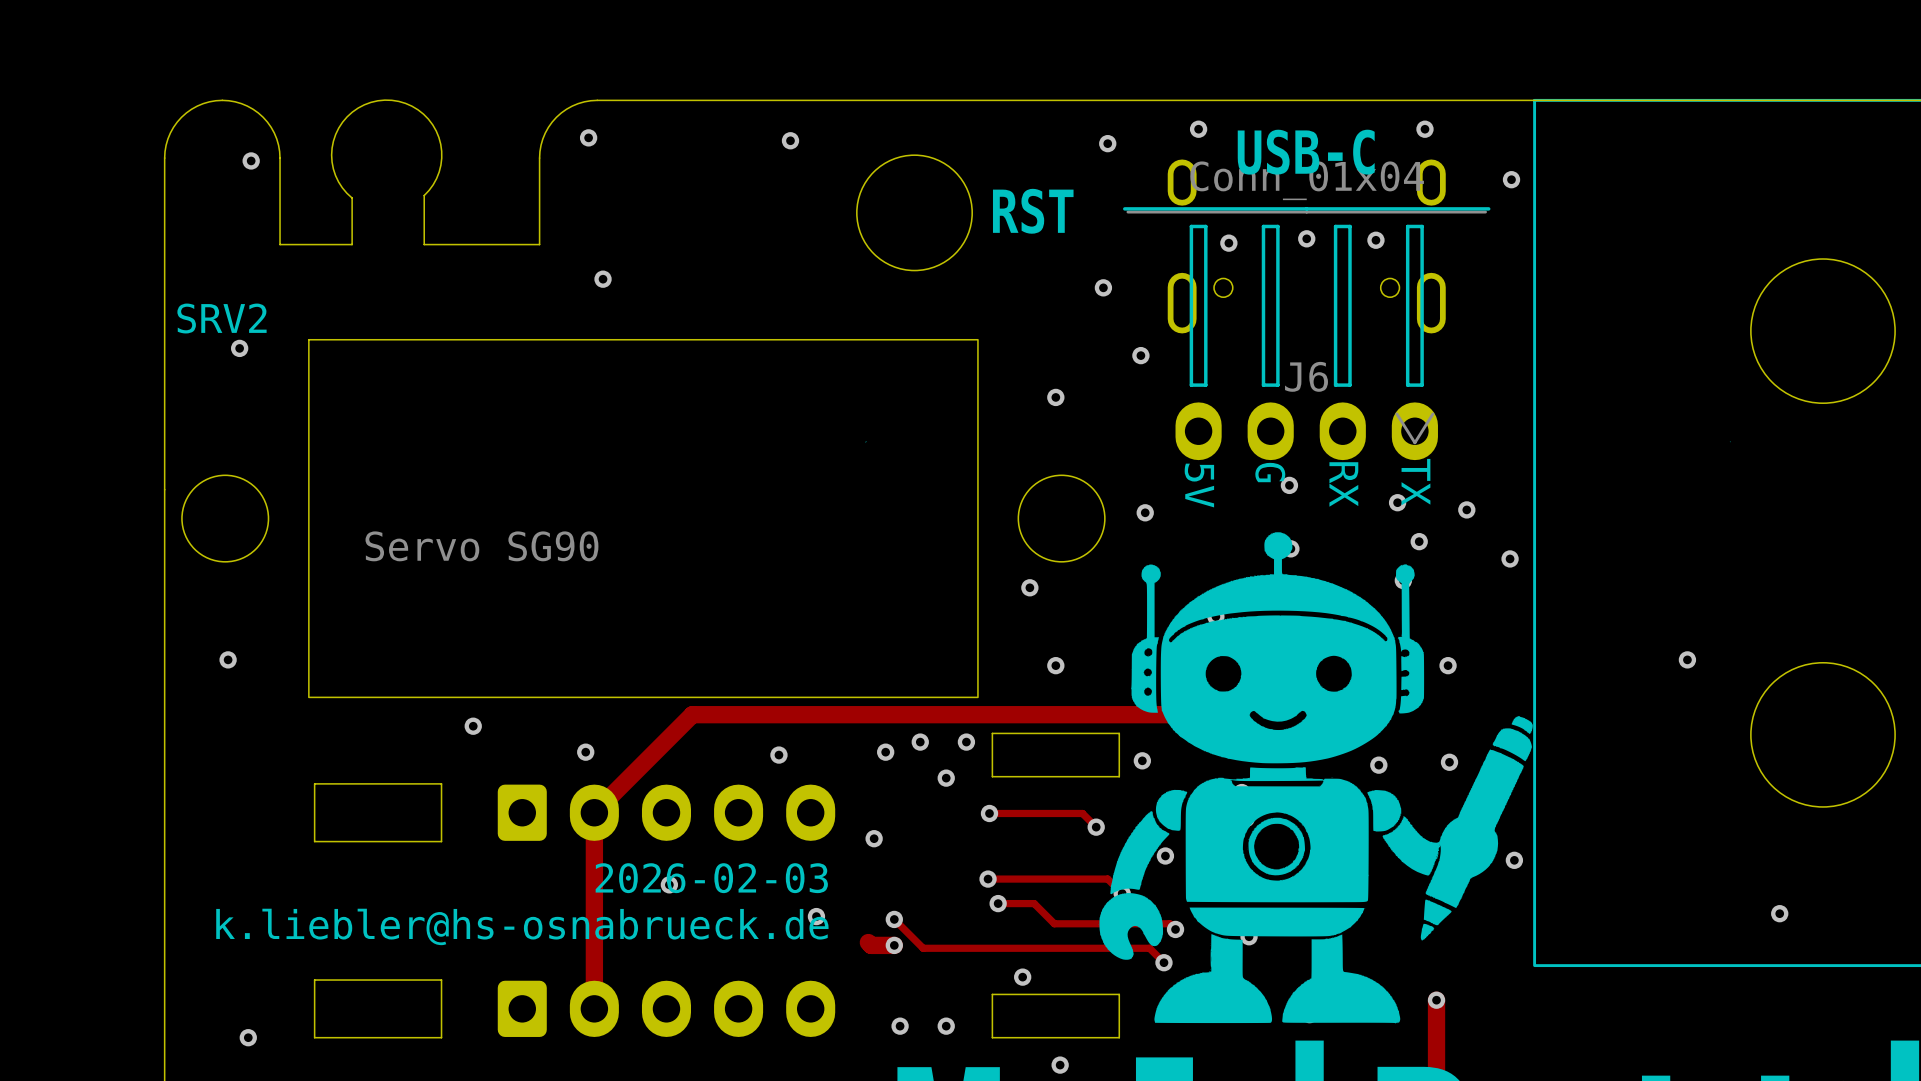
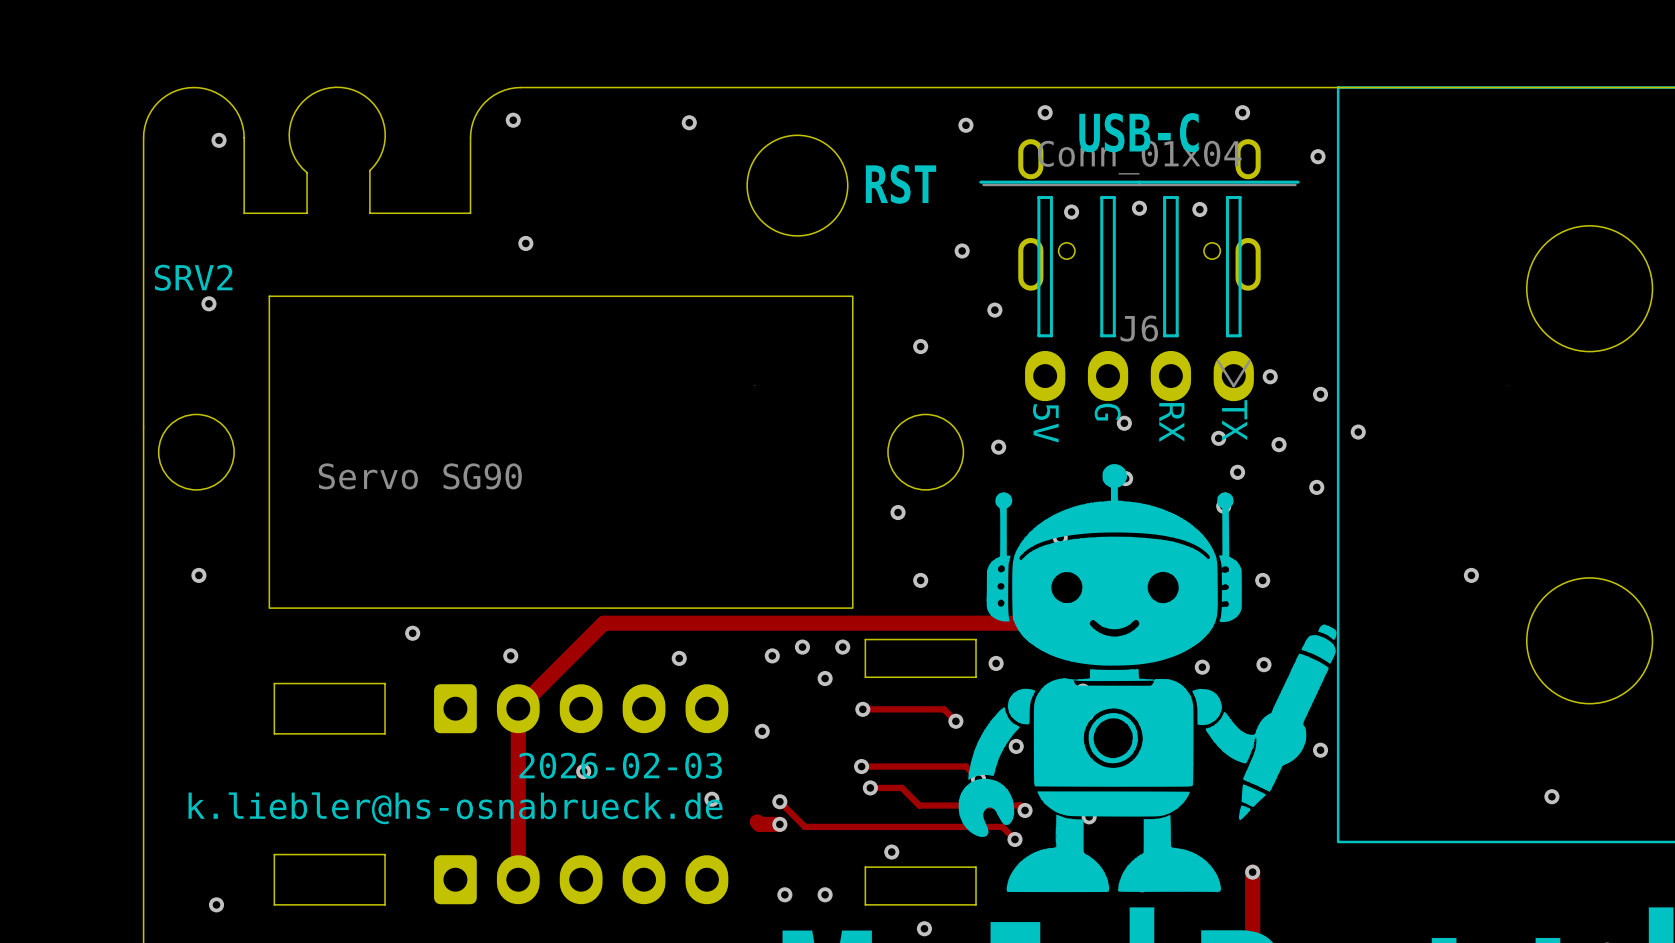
via: none -> (1270, 376)
via: none -> (1320, 394)
via: none -> (1358, 432)

